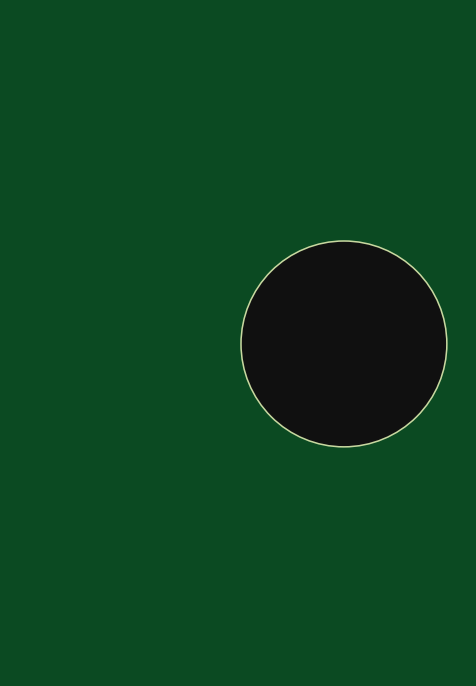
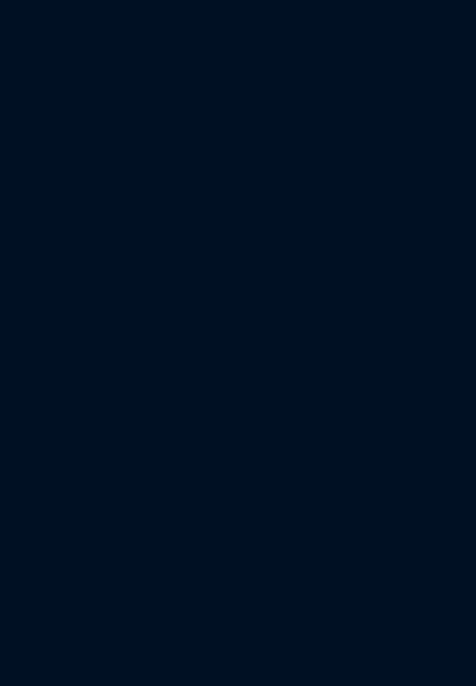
part: (343, 343) -> none

